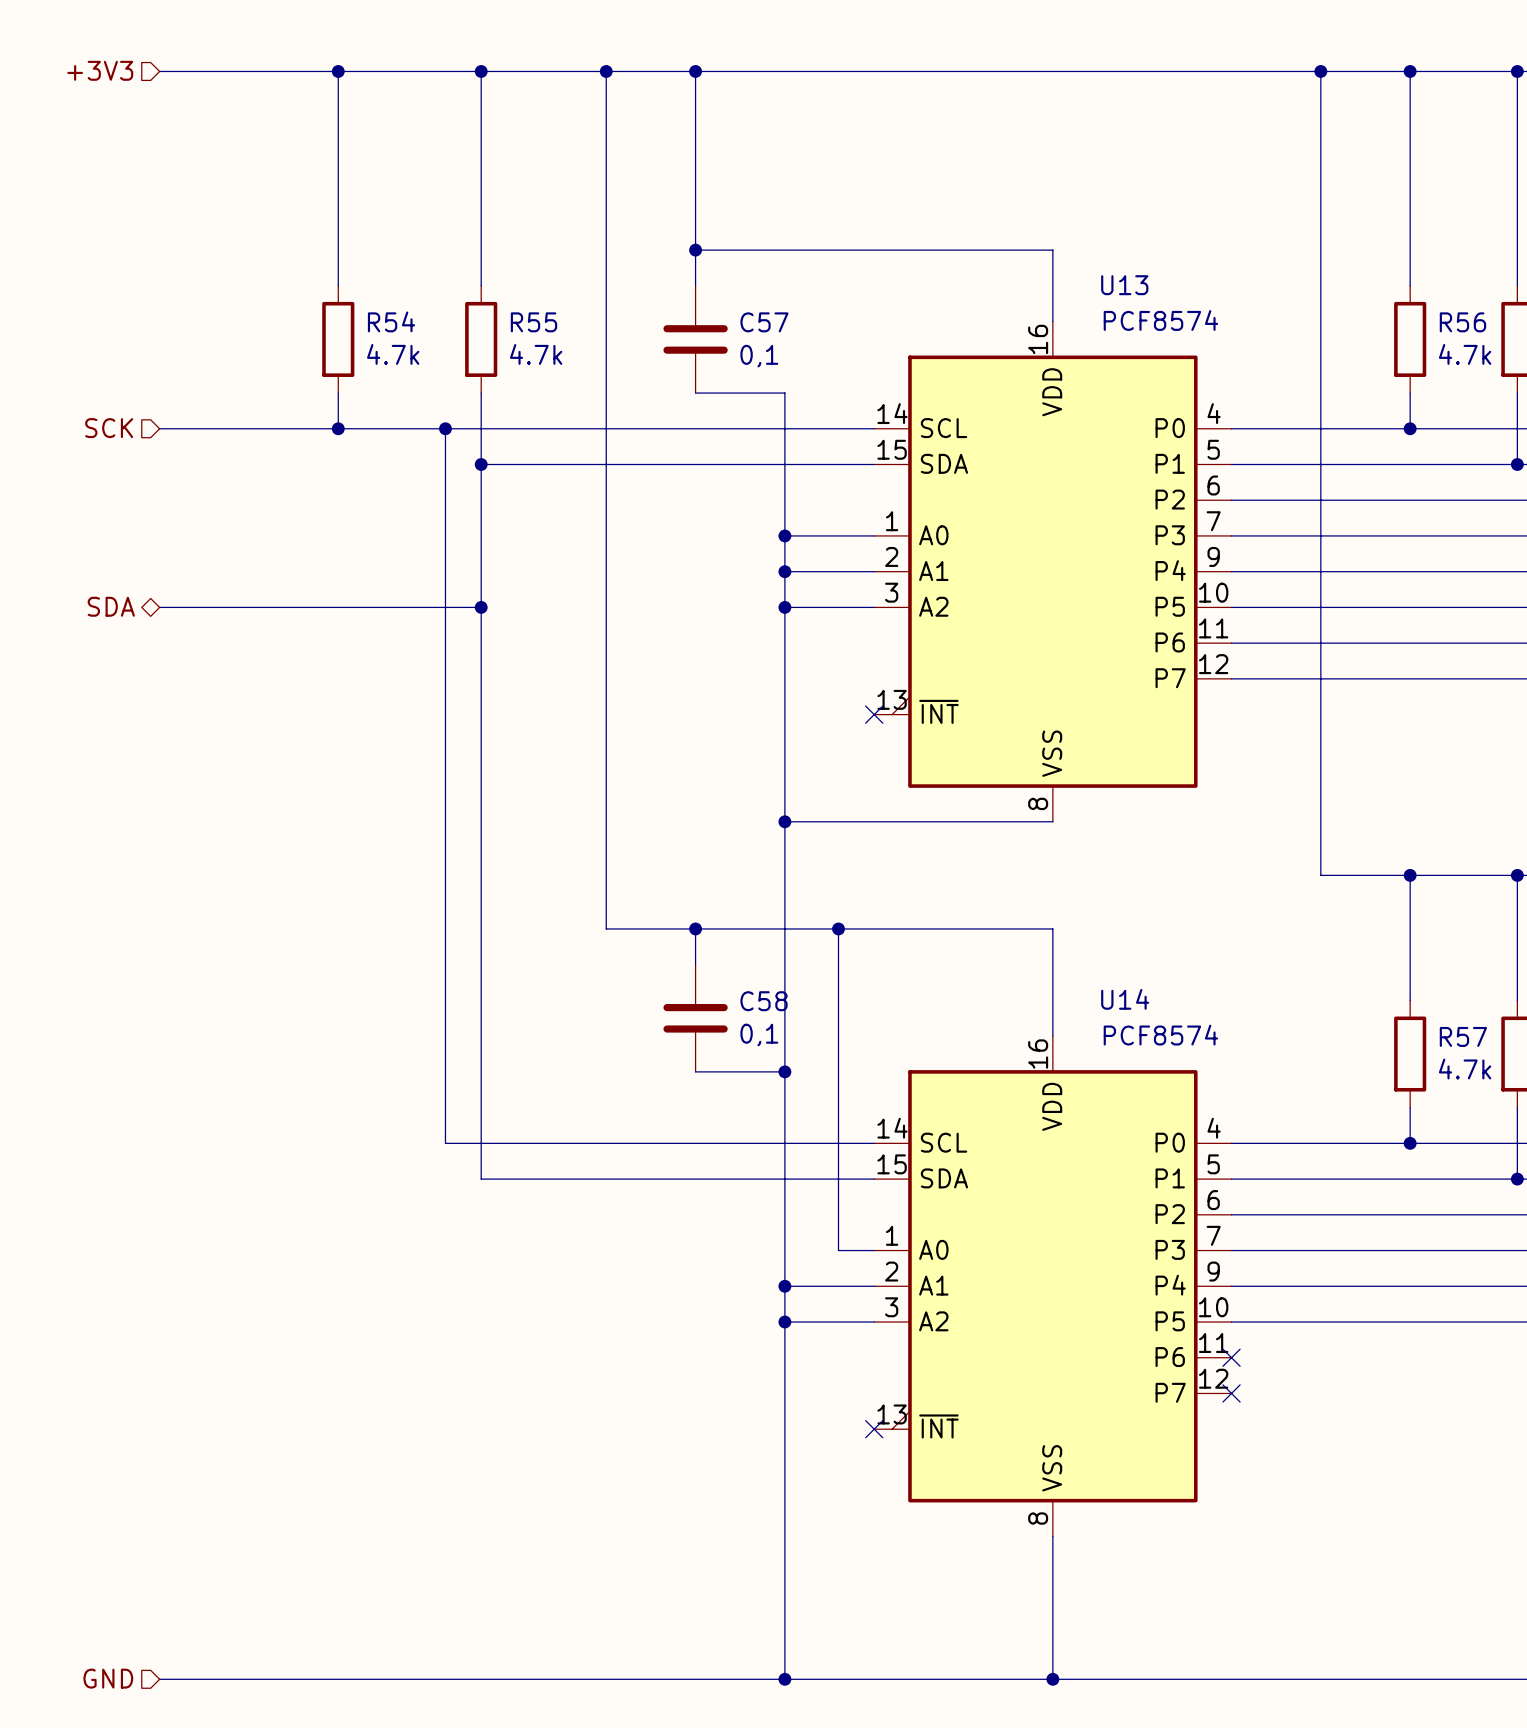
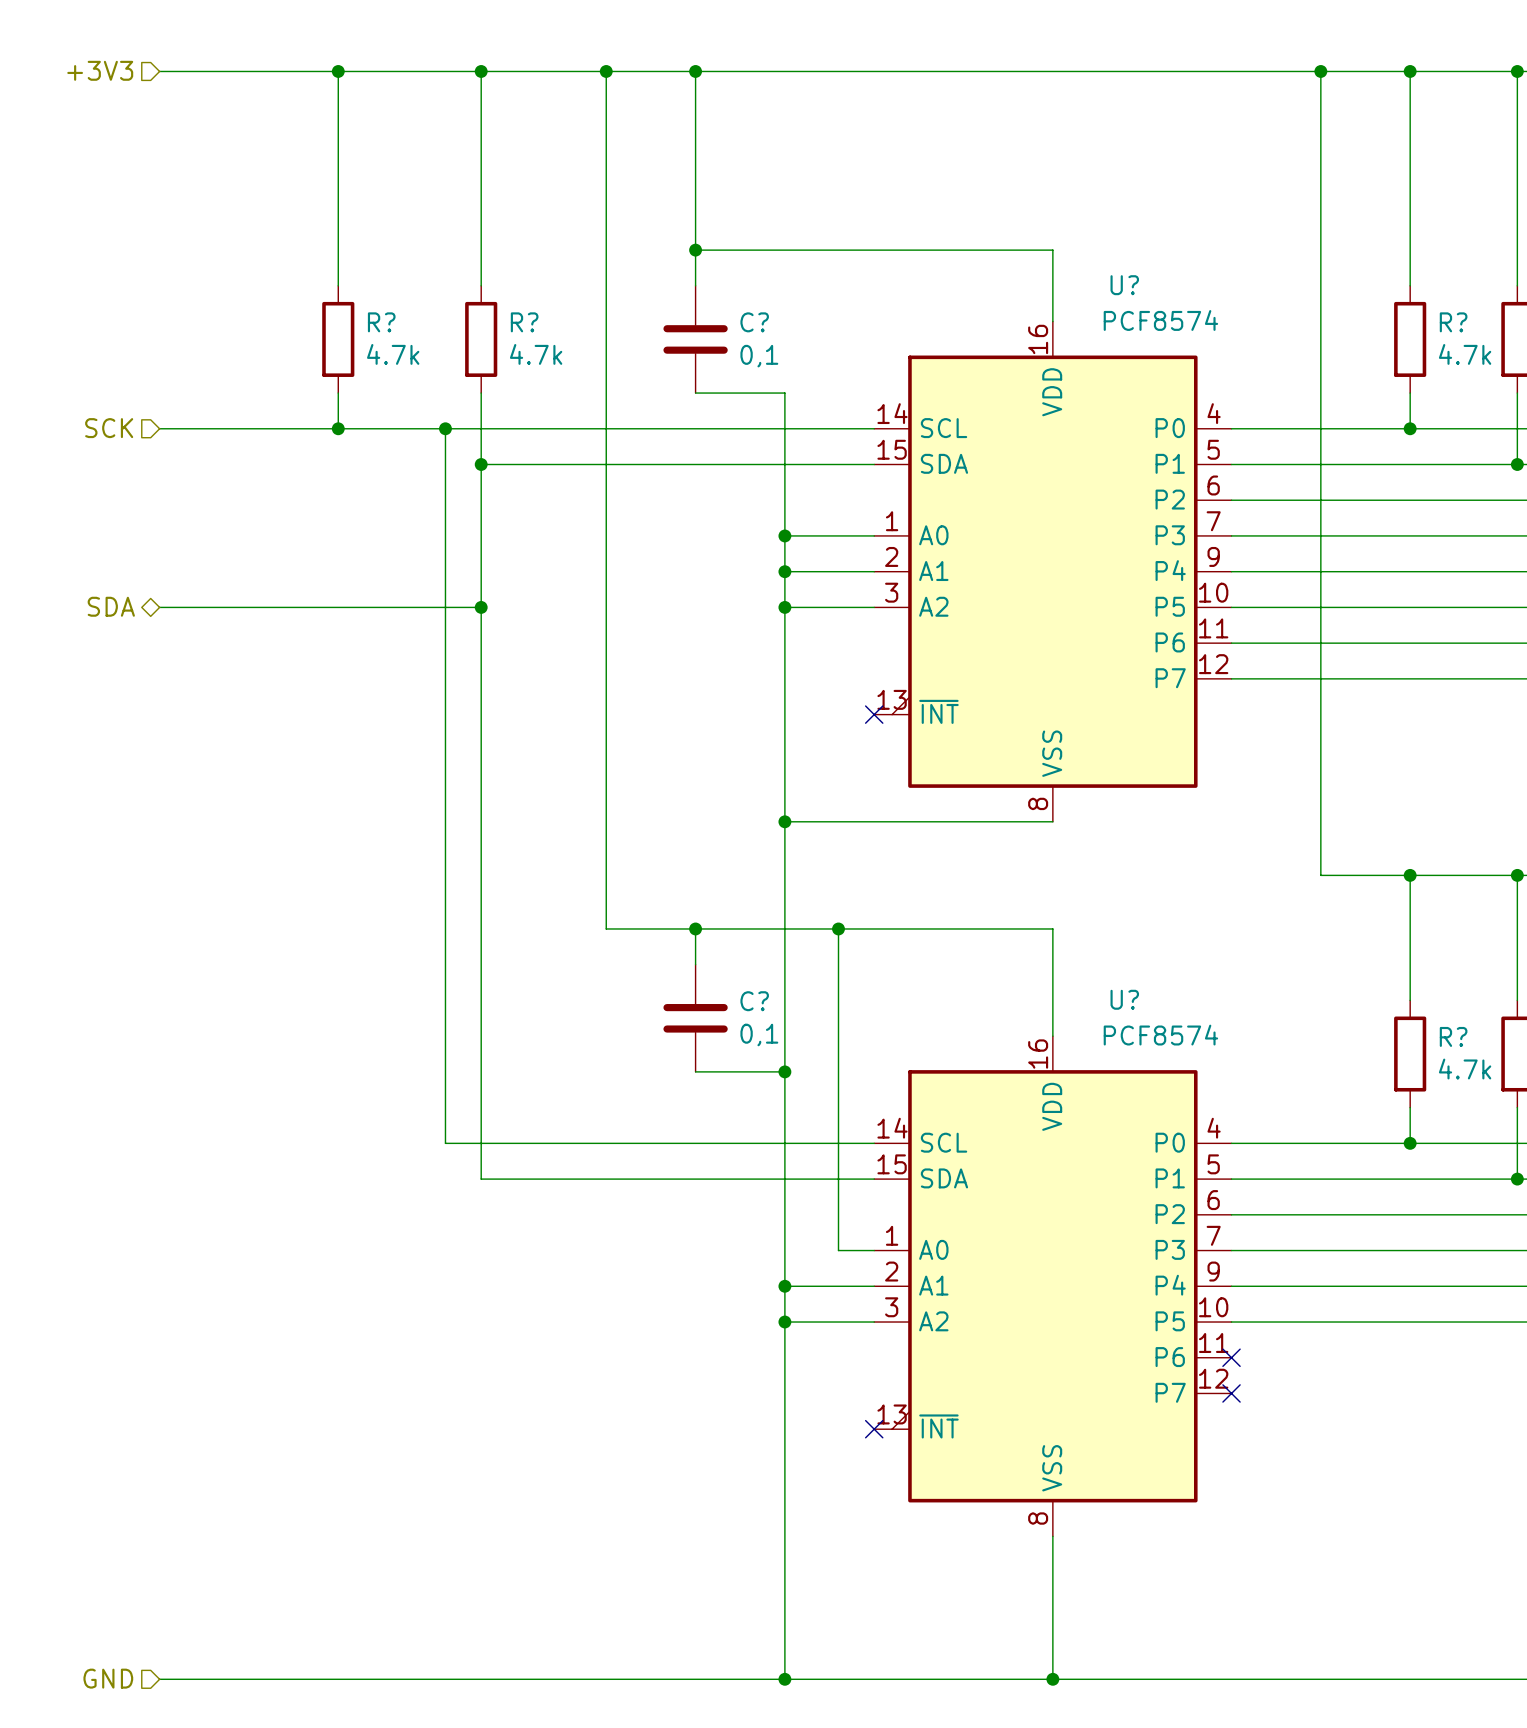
U13 name: U13 (1124, 285) -> U? (1124, 285)
R54 name: R54 (391, 321) -> R? (381, 322)
R55 name: R55 (533, 322) -> R? (524, 322)
C57 name: C57 (764, 322) -> C? (754, 322)
R56 name: R56 (1462, 322) -> R? (1453, 322)
U14 name: U14 (1125, 999) -> U? (1124, 999)
C58 name: C58 (764, 1001) -> C? (754, 1001)
R57 name: R57 (1463, 1036) -> R? (1453, 1036)

